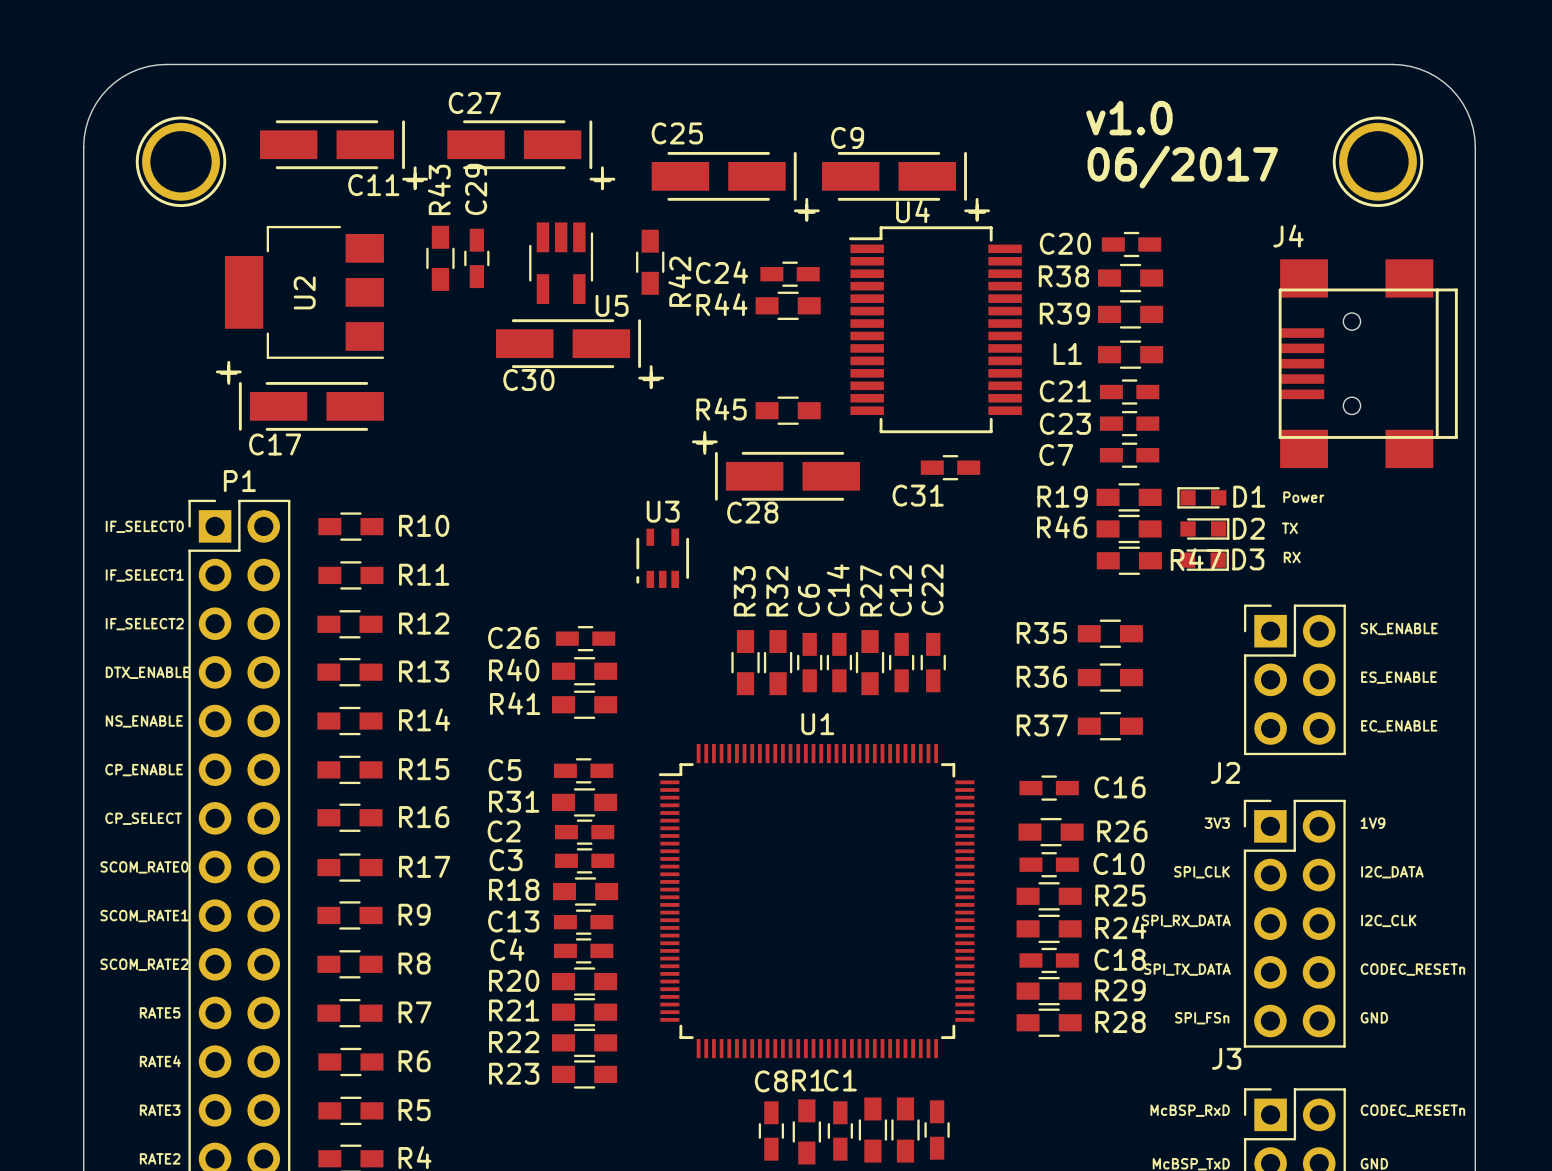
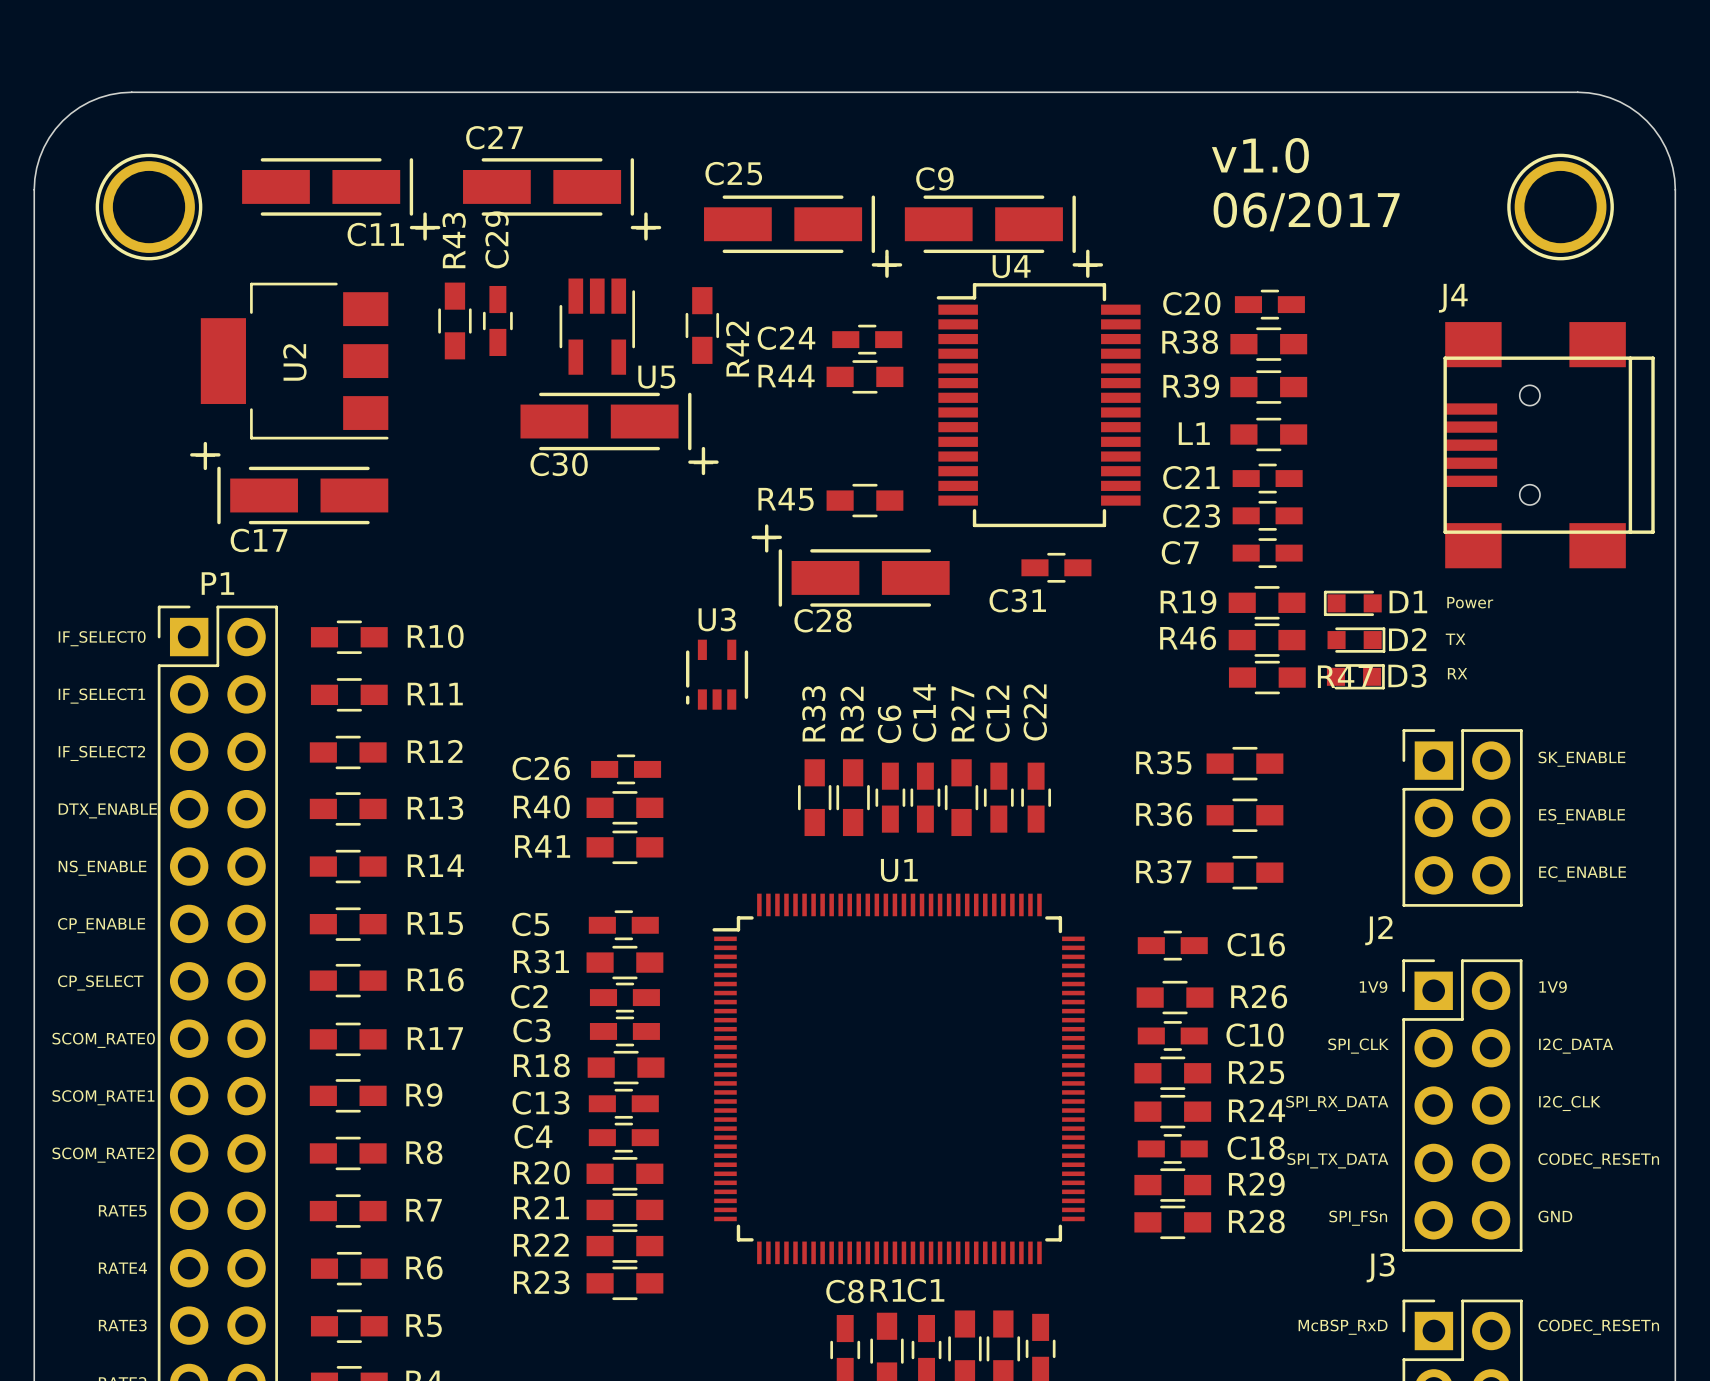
text: 3V3 (1217, 823) -> 1V9 (1373, 986)

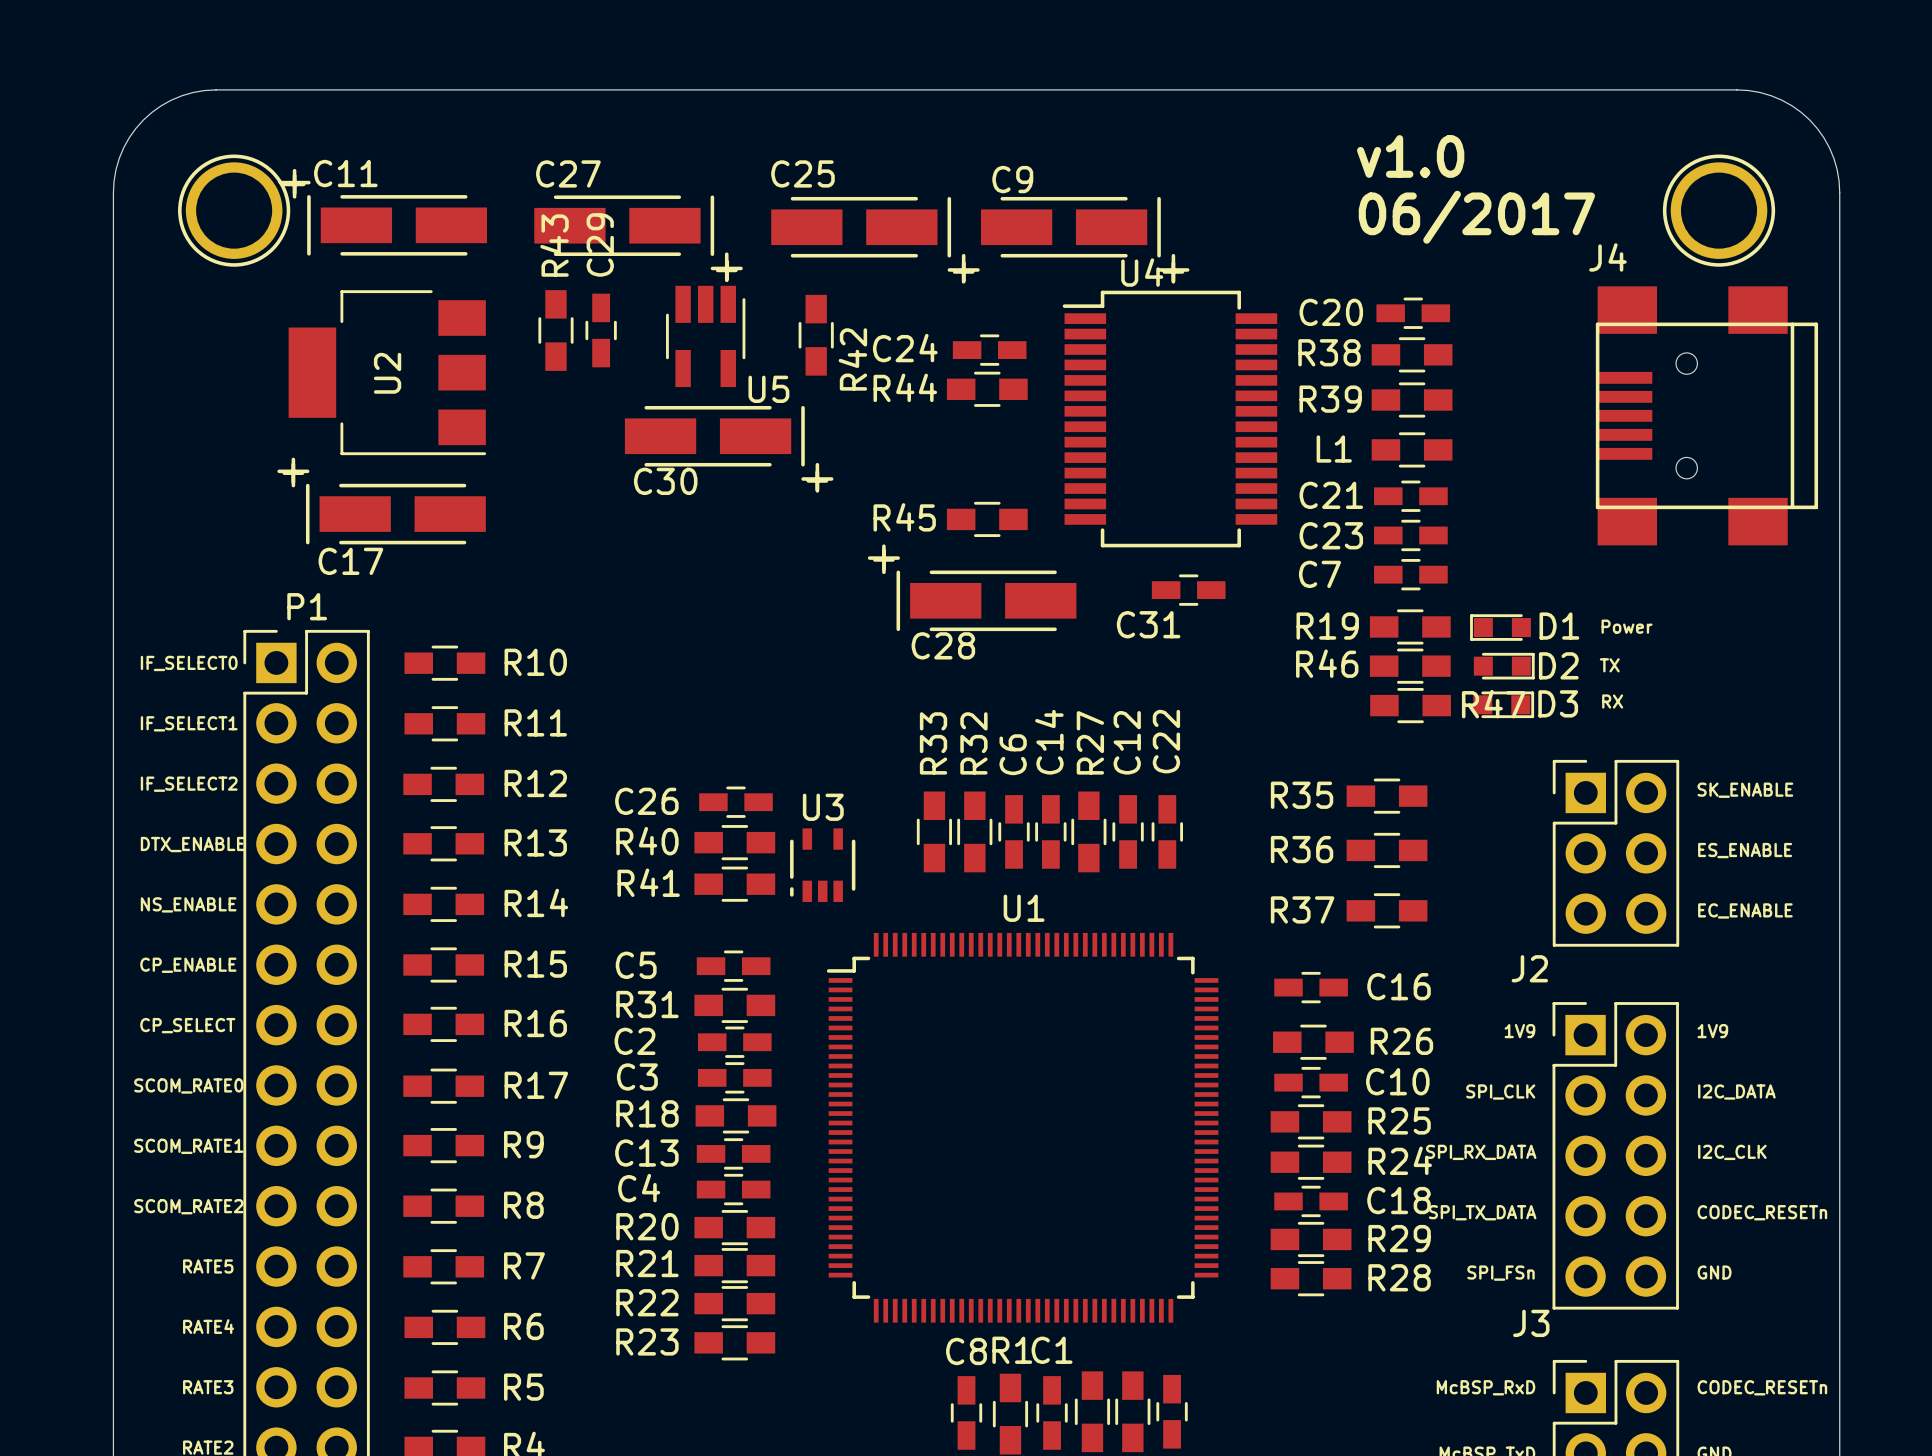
C11 rotation: 0° (341, 199) -> 180° (382, 212)
C27 position: (562, 199) -> (638, 238)
C25 position: (803, 236) -> (875, 240)
C9 position: (1003, 236) -> (1085, 240)
J4 position: (1549, 445) -> (1706, 415)
U3 position: (717, 674) -> (822, 865)

